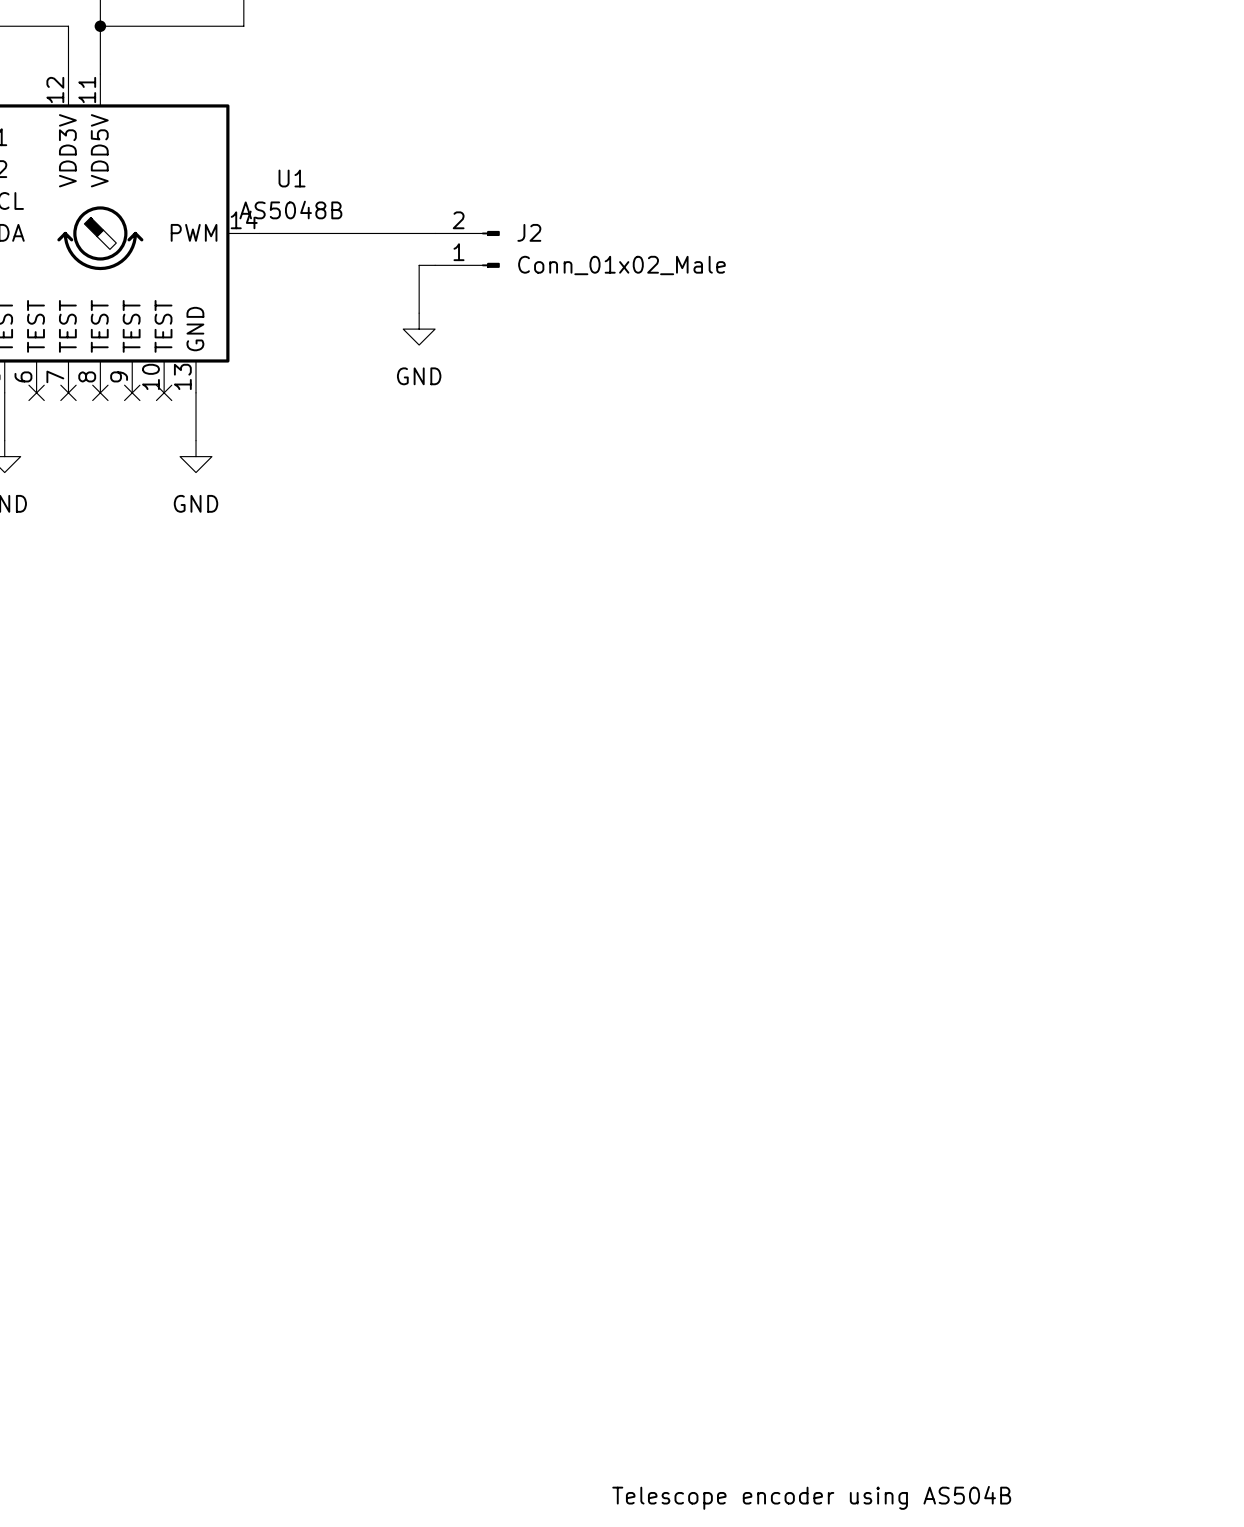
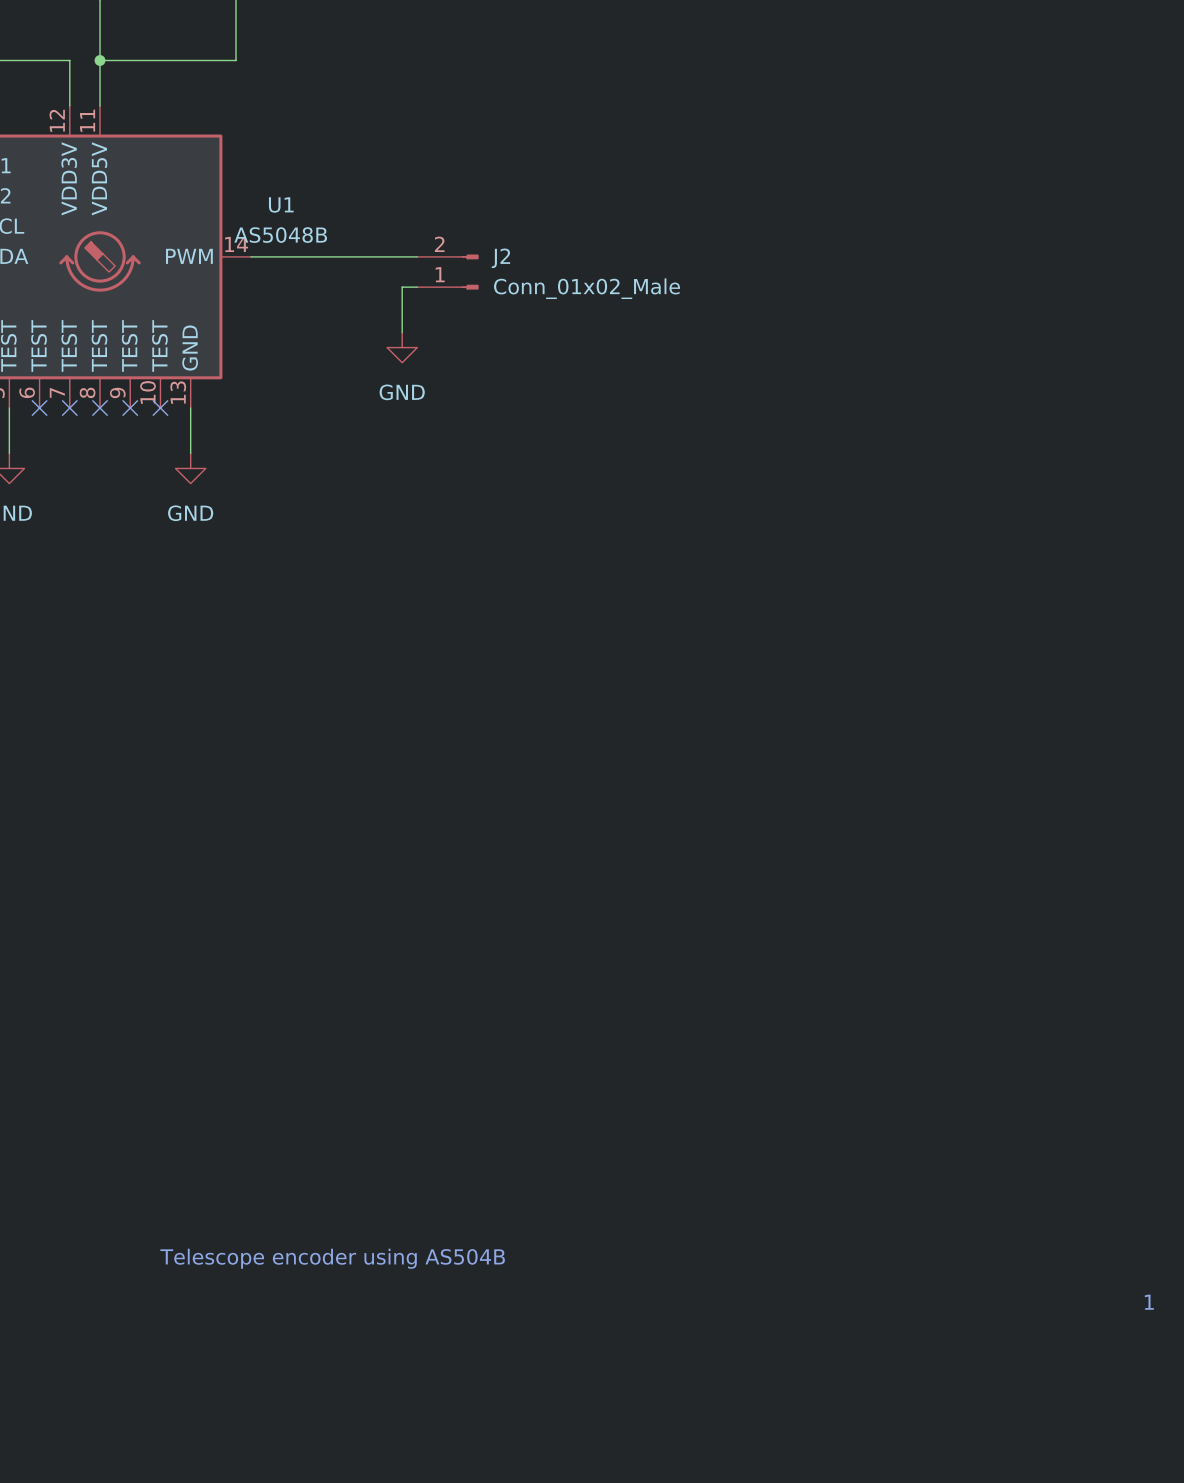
text: none -> Telescope encoder using AS504B (332, 1258)
text: none -> 1 (1149, 1302)
text: Telescope encoder using AS504B (811, 1497) -> none

